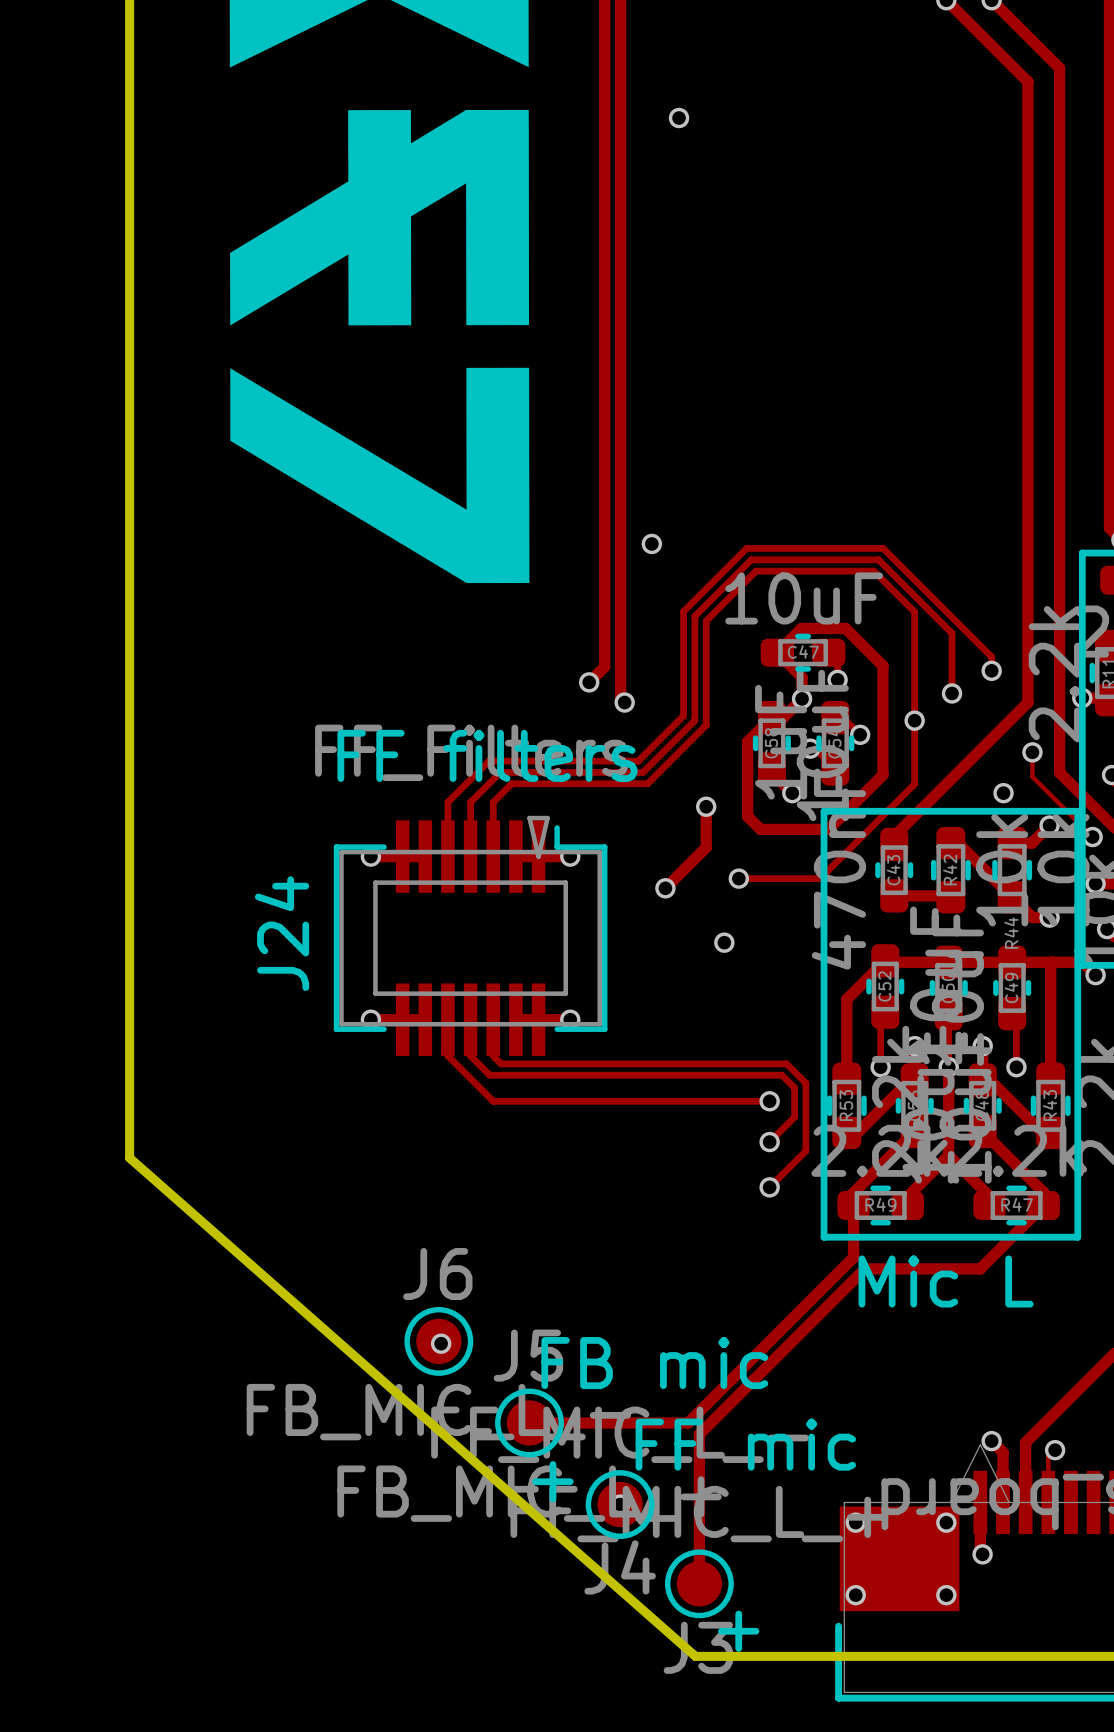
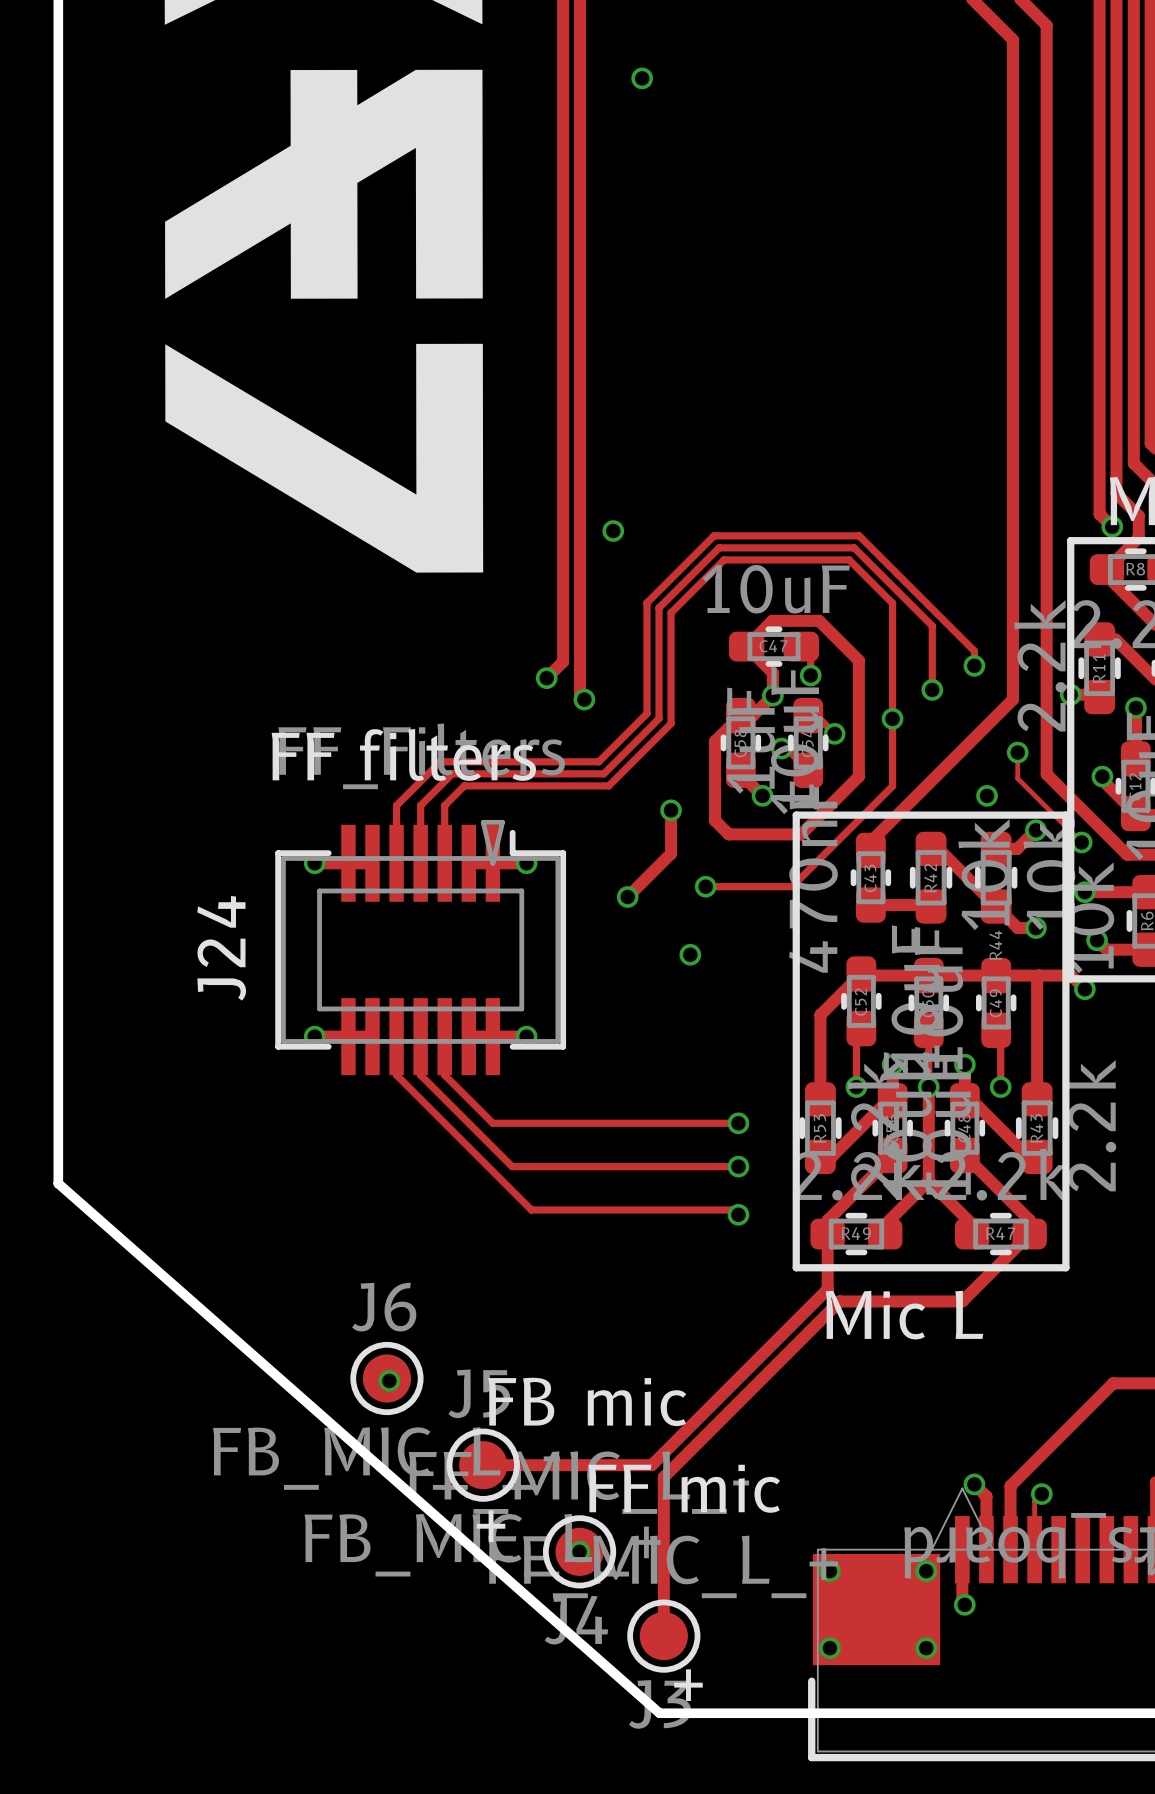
track: (501, 1063) (786, 1063) (805, 1083) (805, 1151) (769, 1187) -> none
track: (489, 1075) (781, 1075) (794, 1087) (794, 1117) (769, 1142) -> (441, 1095) (512, 1166) (738, 1166)
track: (493, 1101) (538, 1101) -> (453, 1083) (492, 1123)
track: none -> (444, 1123) (531, 1209) (738, 1209)

